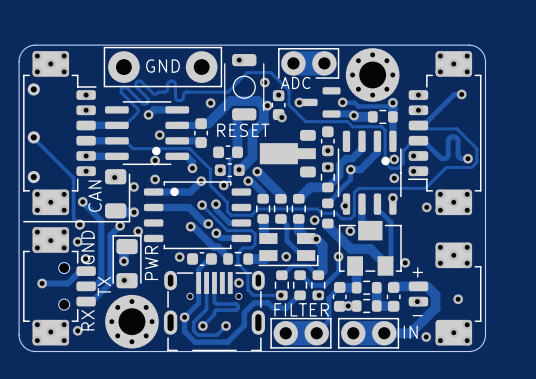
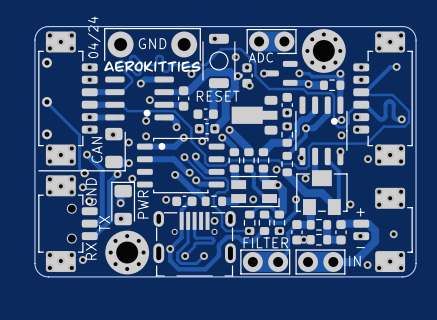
part footprint: [103, 46, 223, 88] -> [104, 27, 201, 62]
part footprint: [23, 51, 97, 216] -> [38, 31, 98, 166]
part footprint: [407, 51, 482, 216] -> [353, 31, 413, 166]
text: none -> 04/24 (94, 37)
drawing: none -> [104, 61, 201, 72]
part footprint: [105, 101, 190, 166] -> [105, 76, 174, 121]
track: (86, 271) (80, 271) (67, 283) (42, 283) (43, 284) -> none
via: (42, 283) -> none

